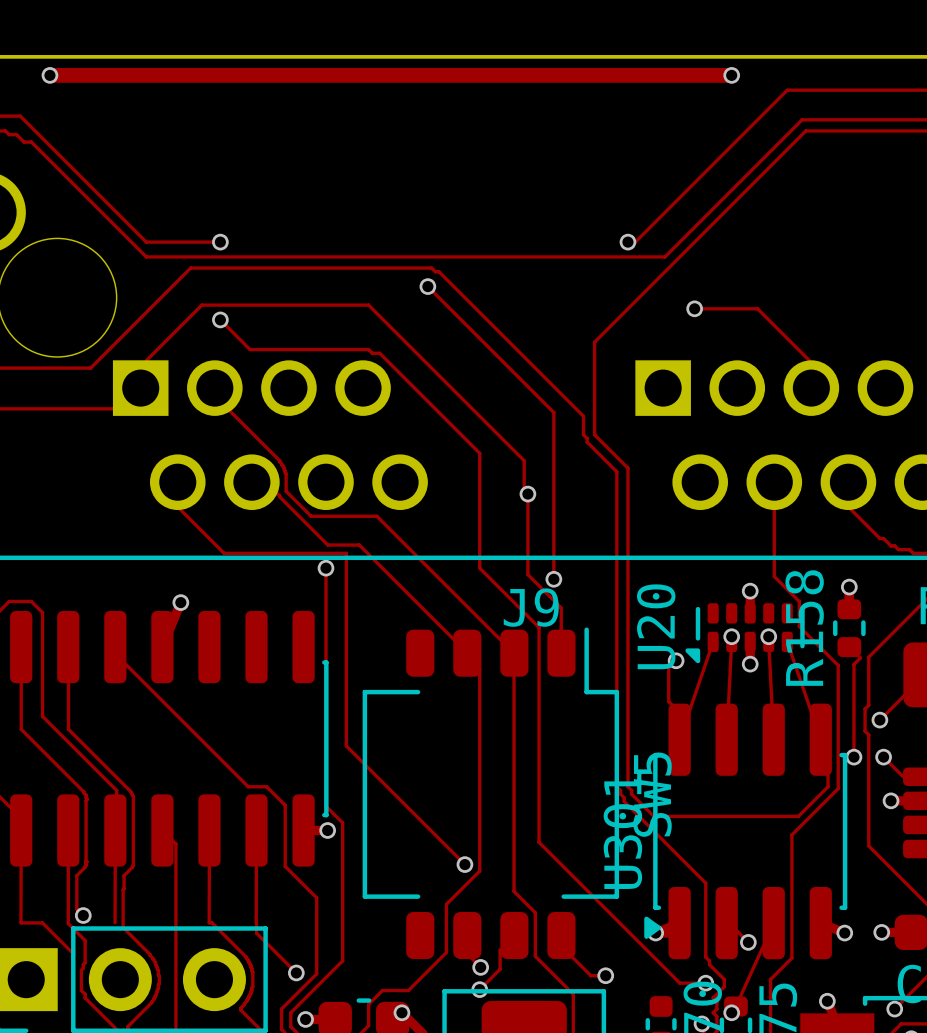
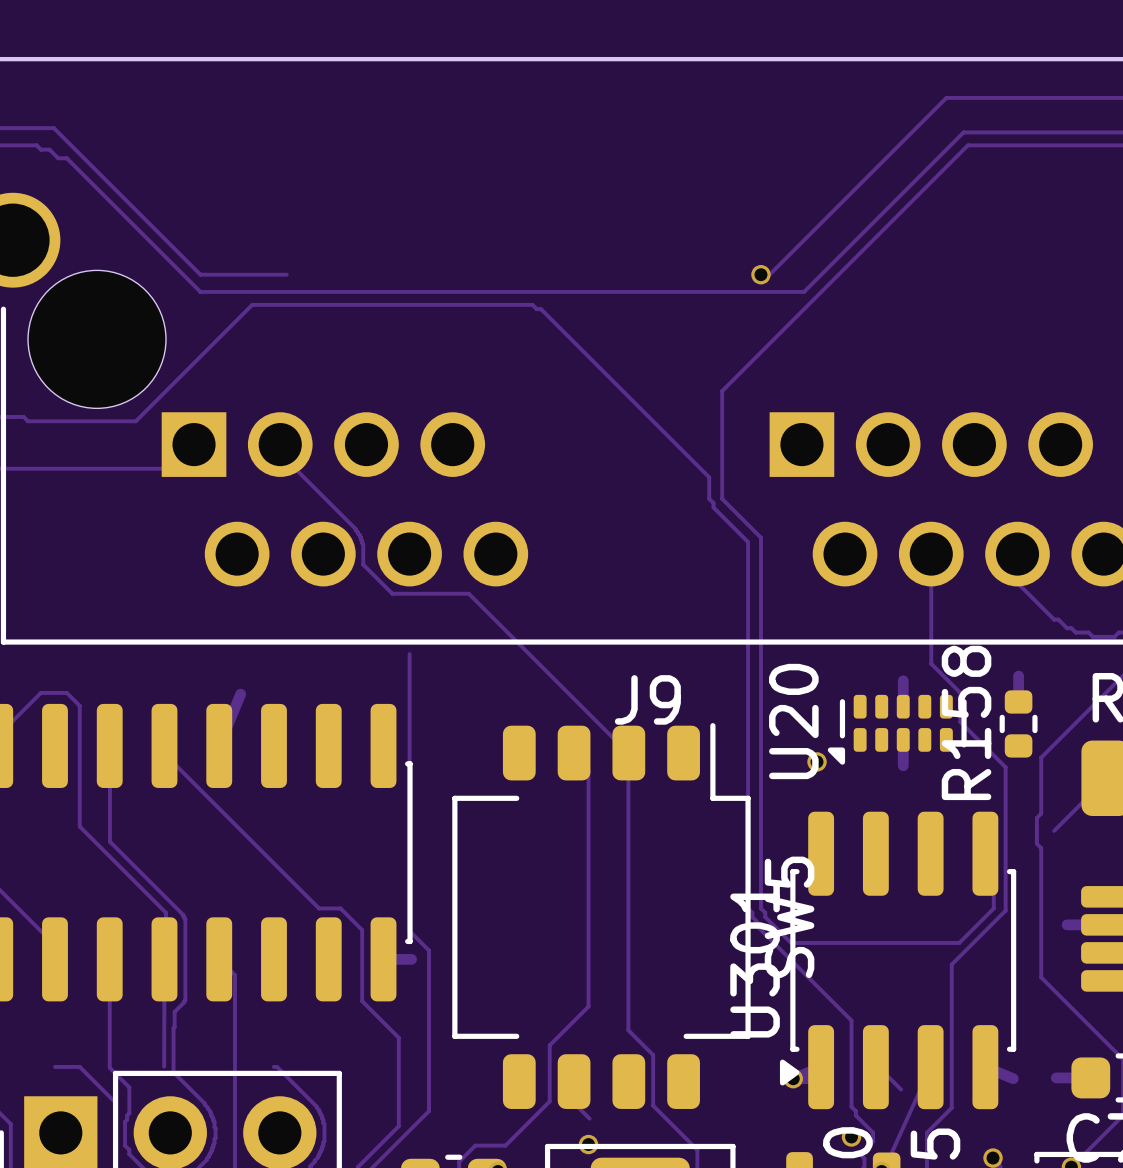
track: (49, 75) (731, 75) -> none
via: (49, 75) -> none
via: (731, 75) -> none
via: (220, 242) -> none
track: (427, 286) (553, 412) (553, 579) -> none
via: (427, 286) -> none
track: (694, 308) (757, 308) (809, 360) -> none
via: (694, 308) -> none
track: (220, 319) (250, 349) (368, 349) (372, 353) (379, 353) (479, 453) (479, 568) (539, 627) (539, 842) (679, 983) (705, 983) -> none
via: (220, 319) -> none
track: (146, 360) (201, 305) (368, 305) (524, 460) (524, 494) -> none
track: (275, 492) (327, 545) (359, 545) (467, 653) -> none
track: (527, 494) (527, 574) (561, 608) (561, 653) -> none
via: (527, 494) -> none
track: (172, 501) (224, 553) (346, 553) (346, 746) (464, 864) -> none
via: (325, 568) -> none
via: (553, 579) -> none
via: (849, 587) -> none
via: (750, 591) -> none
via: (180, 602) -> none
via: (731, 636) -> none
via: (768, 636) -> none
track: (713, 641) (679, 739) -> none
track: (731, 641) (726, 739) -> none
track: (768, 641) (773, 739) -> none
track: (787, 641) (820, 739) -> none
track: (21, 646) (21, 729) (84, 792) (87, 798) (87, 861) (85, 867) (76, 875) (76, 909) (83, 915) -> none
track: (849, 646) (860, 658) (853, 664) (853, 757) -> none
track: (676, 660) (668, 668) (668, 701) (672, 705) -> none
via: (750, 664) -> none
via: (879, 720) -> none
via: (853, 757) -> none
track: (883, 757) (903, 776) -> none
via: (883, 757) -> none
via: (891, 800) -> none
track: (21, 830) (20, 922) -> none
track: (209, 830) (209, 922) -> none
track: (256, 830) (256, 922) -> none
via: (327, 830) -> none
via: (464, 864) -> none
via: (83, 915) -> none
track: (256, 922) (256, 933) (296, 972) -> none
via: (881, 932) -> none
via: (844, 933) -> none
via: (748, 942) -> none
track: (500, 949) (500, 969) (479, 989) -> none
track: (572, 957) (590, 975) (605, 975) -> none
via: (480, 967) -> none
via: (296, 972) -> none
via: (605, 975) -> none

